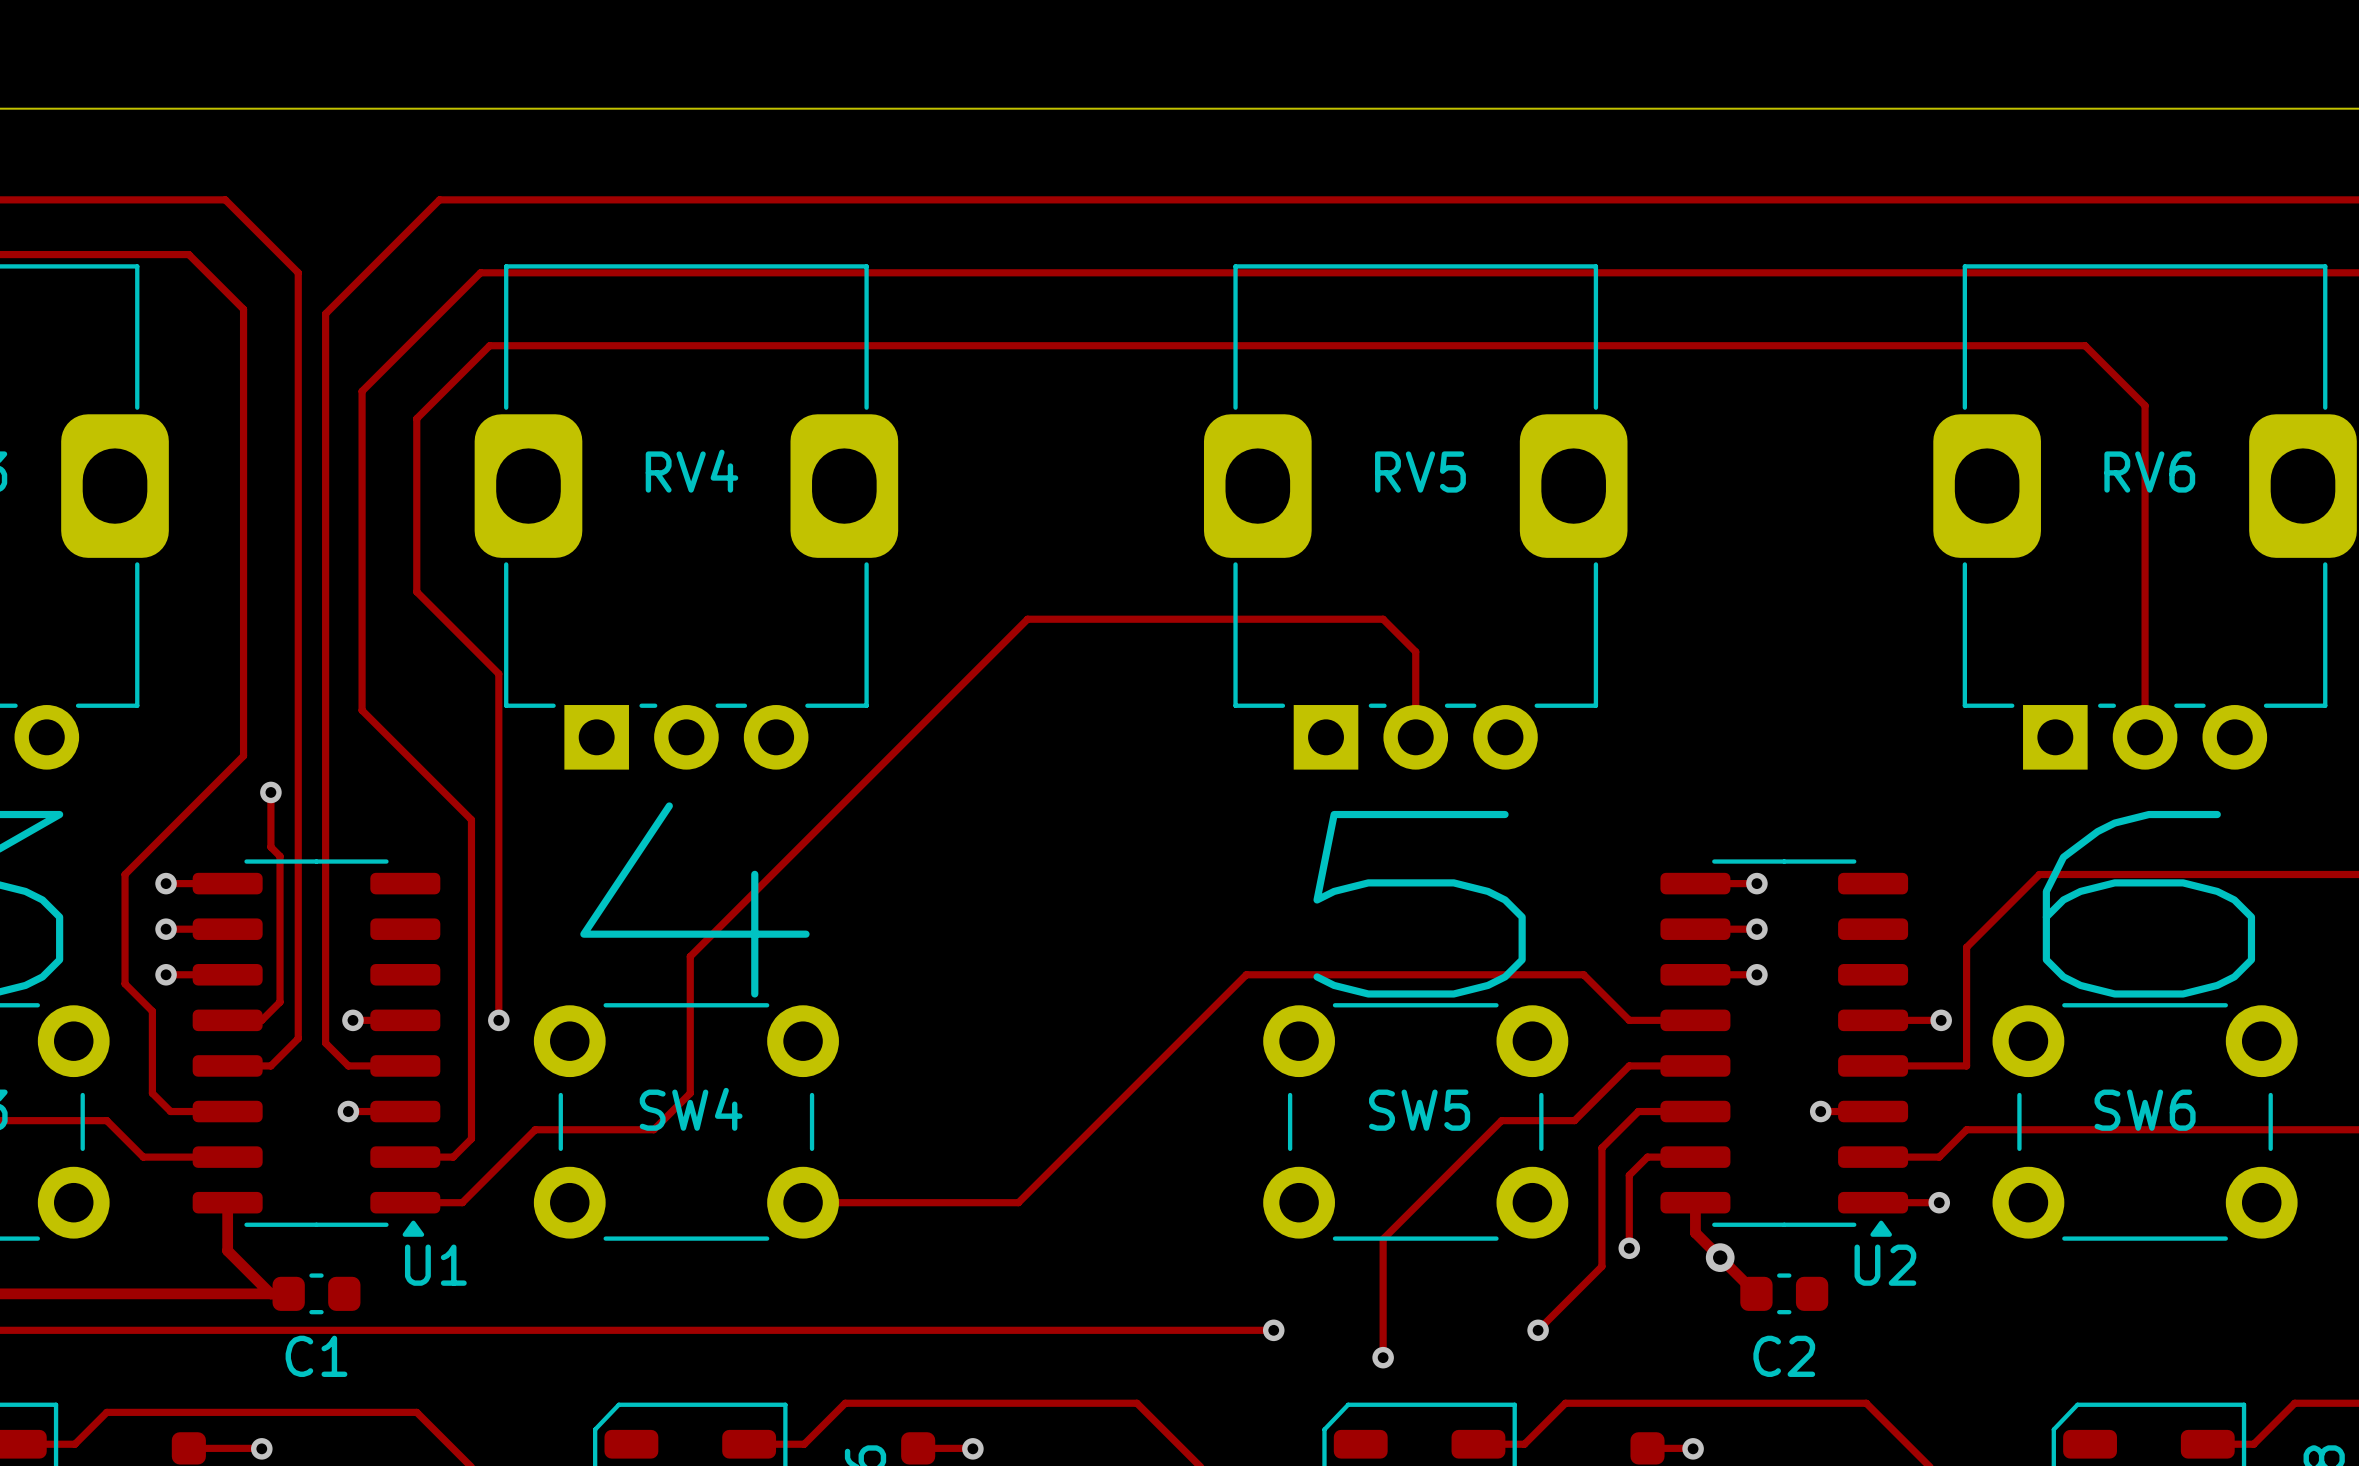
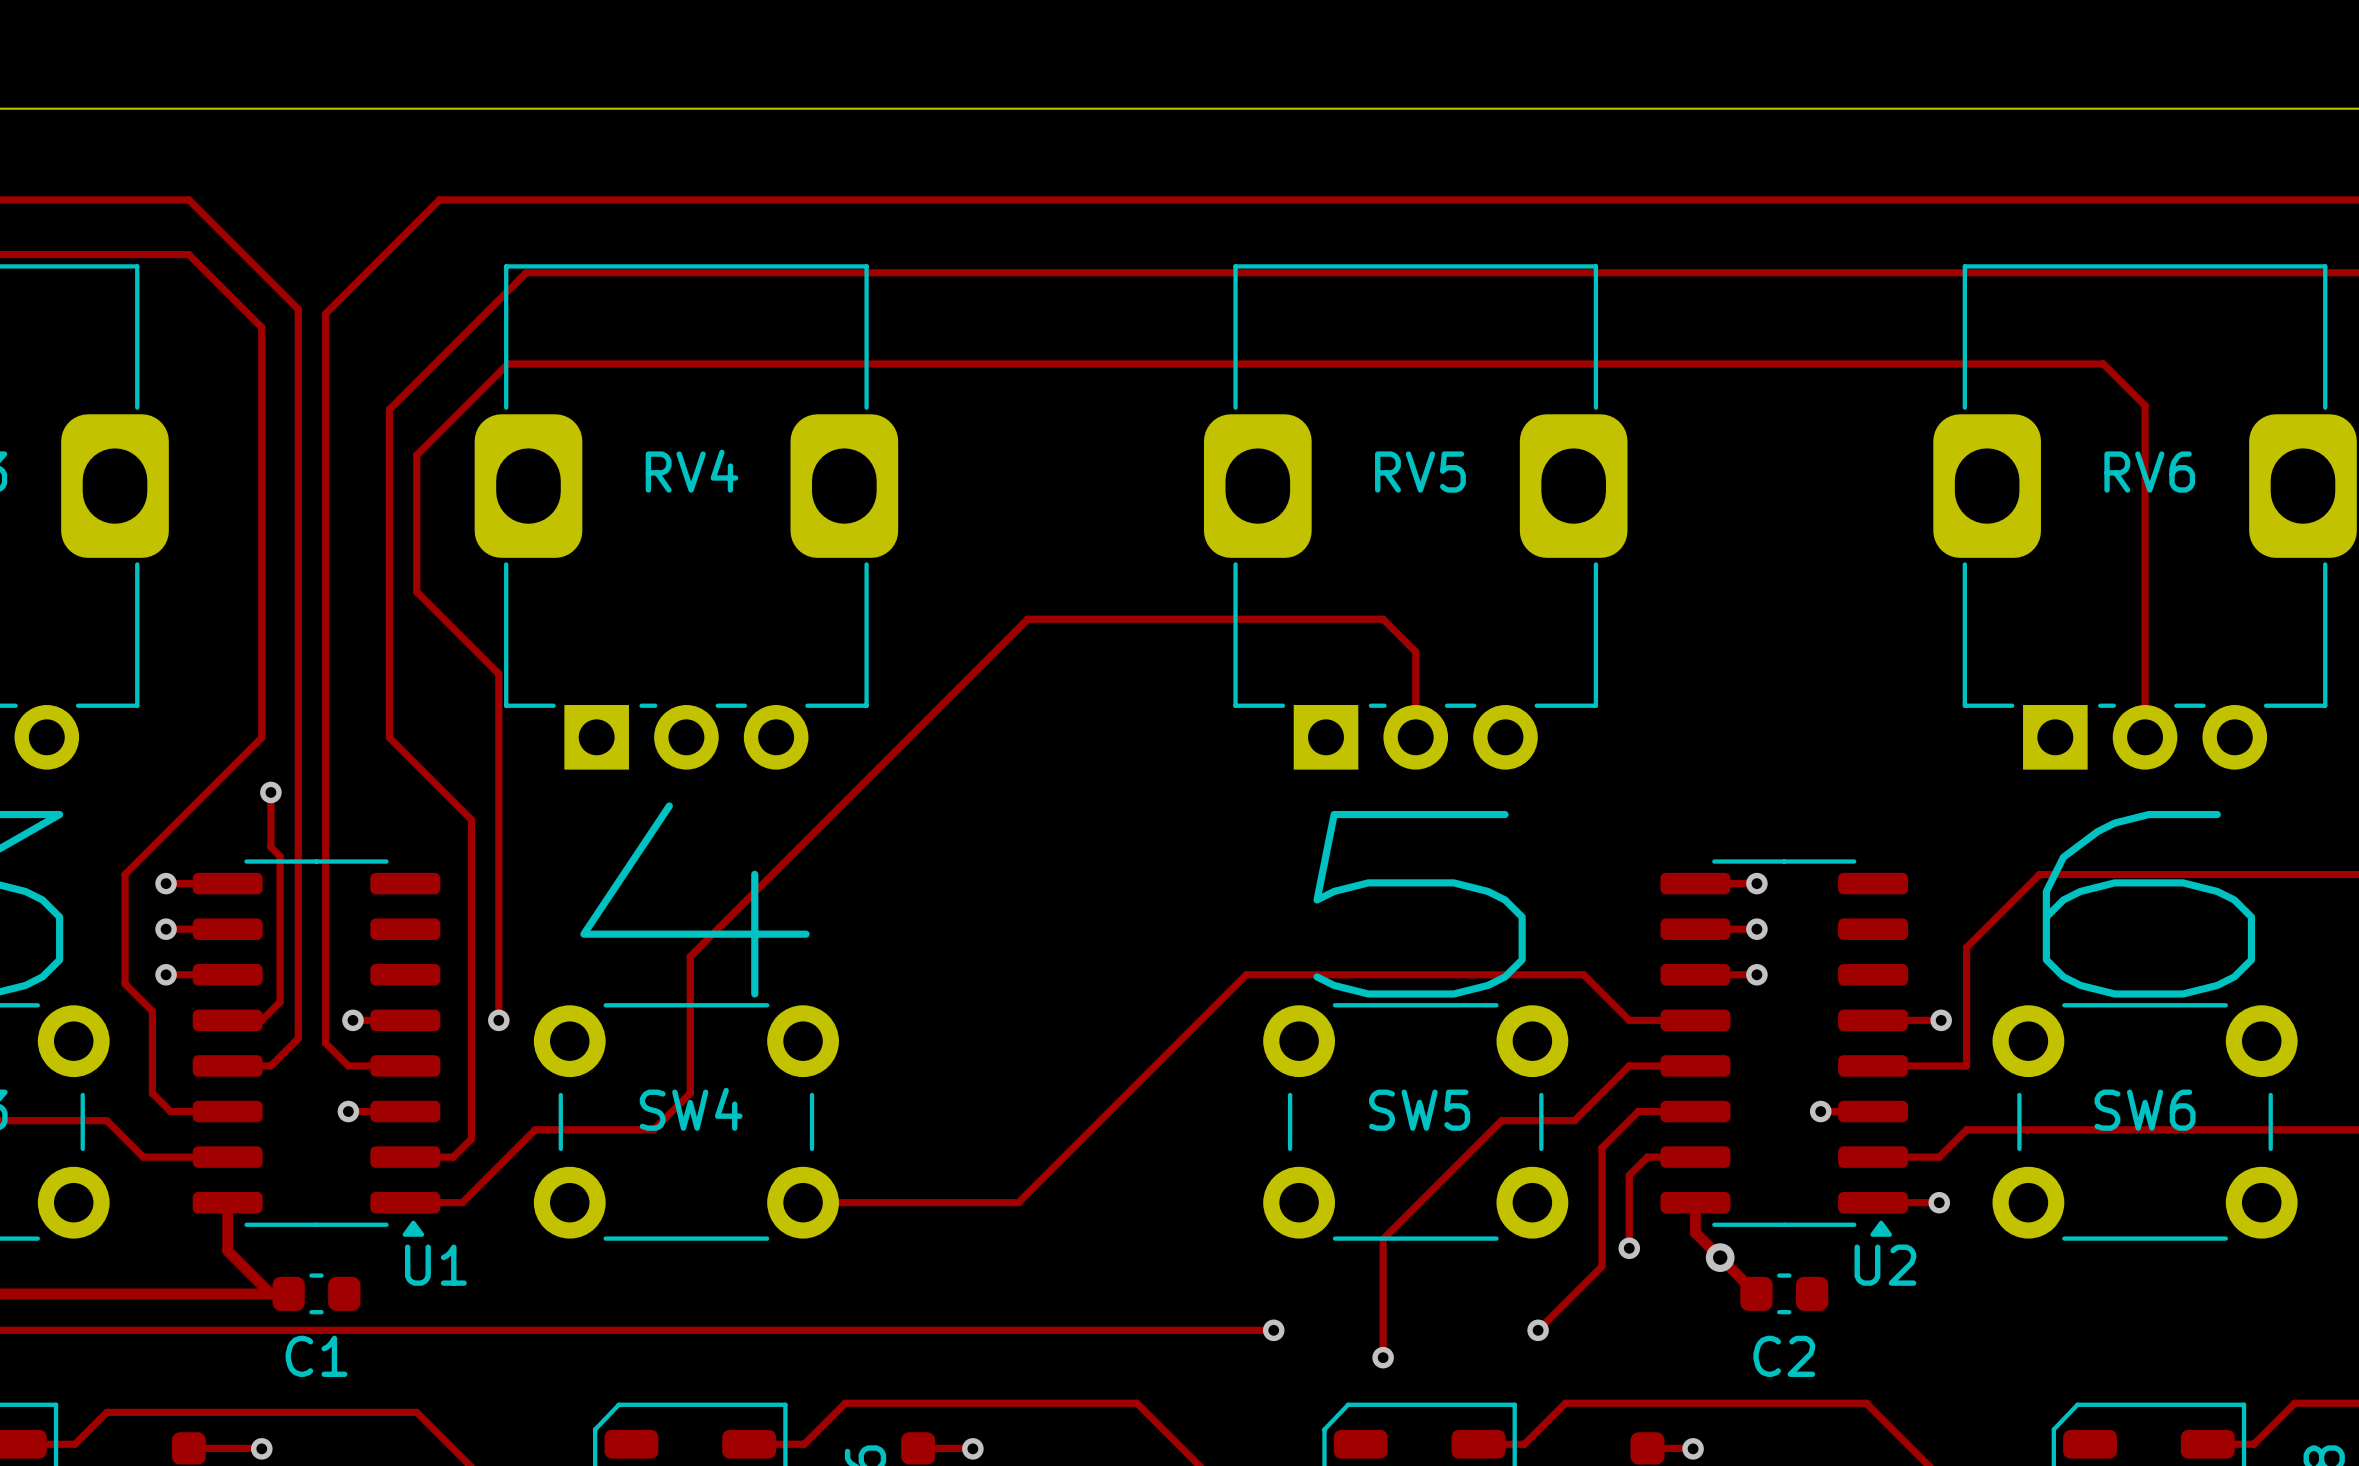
track: (188, 199) (225, 199) (298, 272) (298, 309) -> (188, 199) (298, 309)
track: (526, 272) (480, 272) (362, 391) (362, 710) (389, 737) -> (526, 272) (389, 409) (389, 737)
track: (243, 309) (243, 755) -> (243, 309) (261, 327) (261, 737) (243, 755)
track: (2103, 363) (2085, 345) (489, 345) (416, 418) (416, 455) -> (2103, 363) (507, 363) (416, 455)

